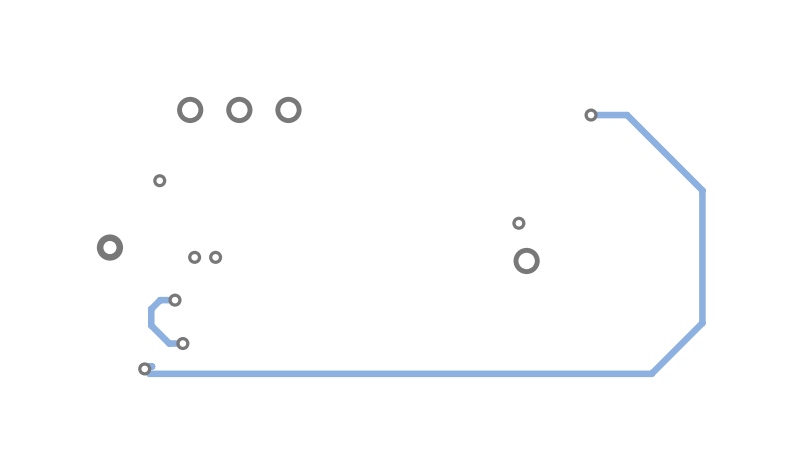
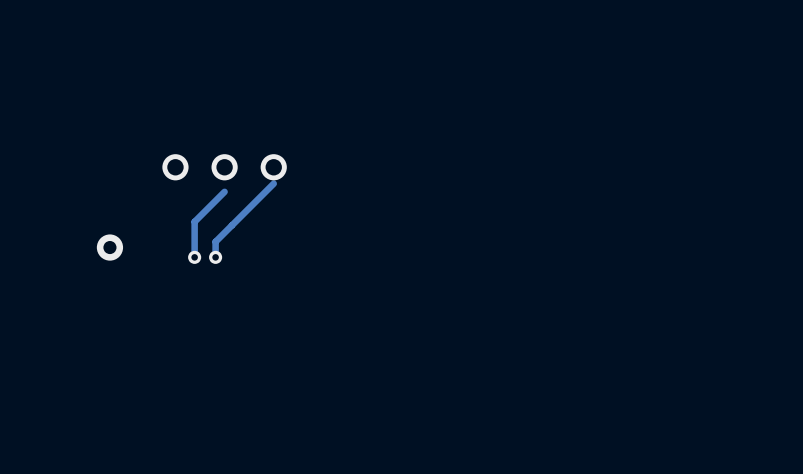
via: (190, 109) -> none
via: (239, 109) -> none
via: (288, 109) -> none
track: (591, 115) (627, 115) (702, 190) (702, 323) (651, 373) (149, 373) (144, 368) (147, 366) (152, 366) -> none
via: (591, 115) -> none
via: none -> (224, 167)
via: none -> (273, 167)
via size: [153, 174, 167, 188] -> [162, 154, 189, 181]
track: none -> (273, 183) (215, 241) (215, 257)
track: none -> (224, 191) (194, 221) (194, 257)
via: (518, 223) -> none
via: (526, 260) -> none
track: (175, 300) (160, 300) (151, 309) (151, 325) (169, 343) (182, 343) -> none
via: (175, 300) -> none
via: (182, 343) -> none
via: (144, 368) -> none

